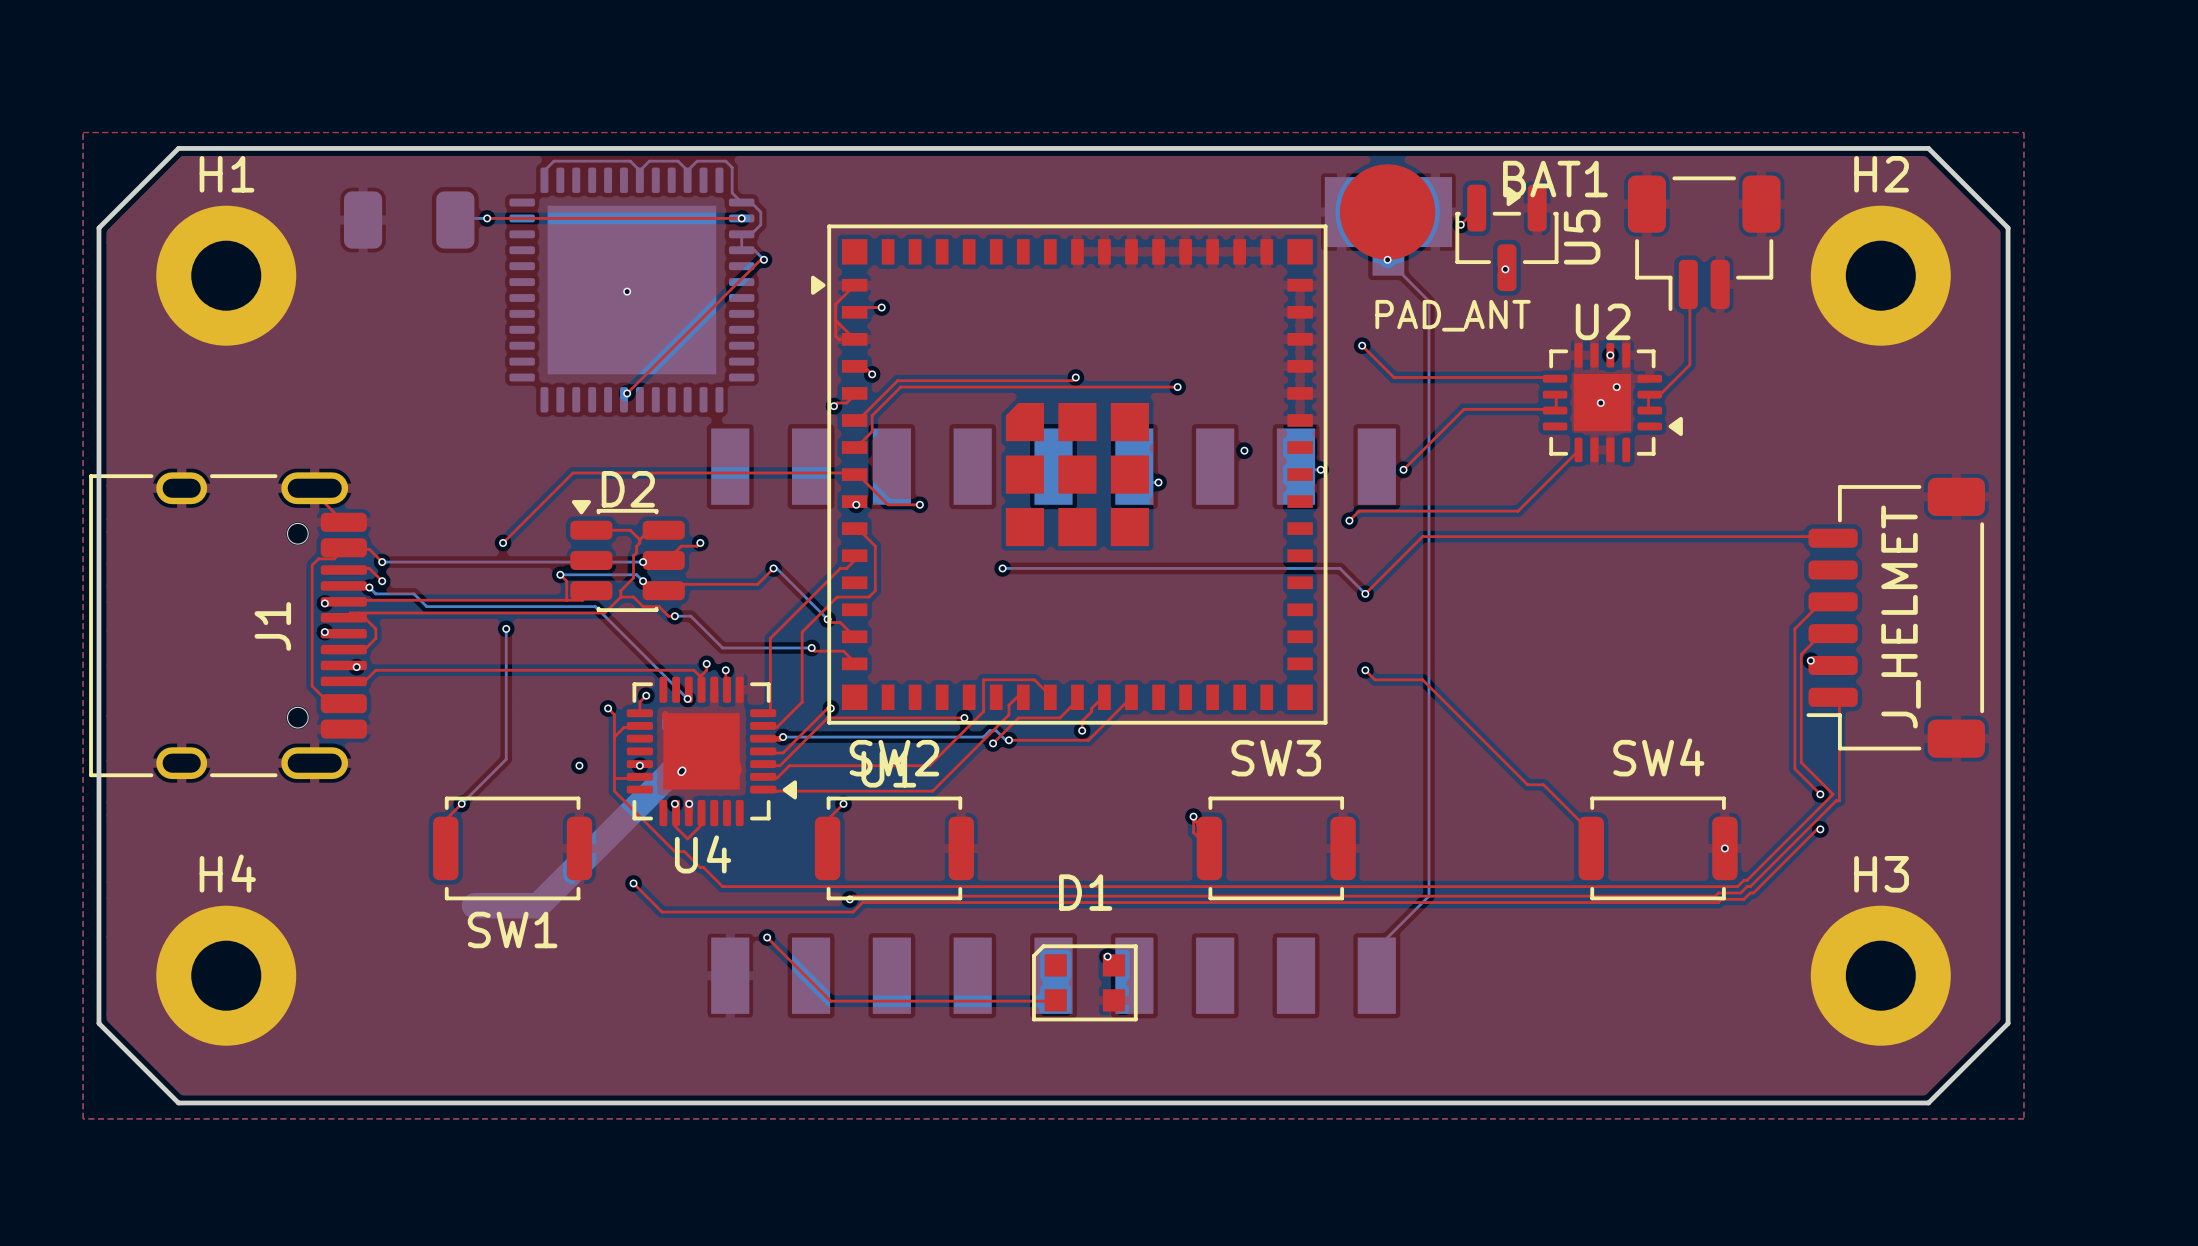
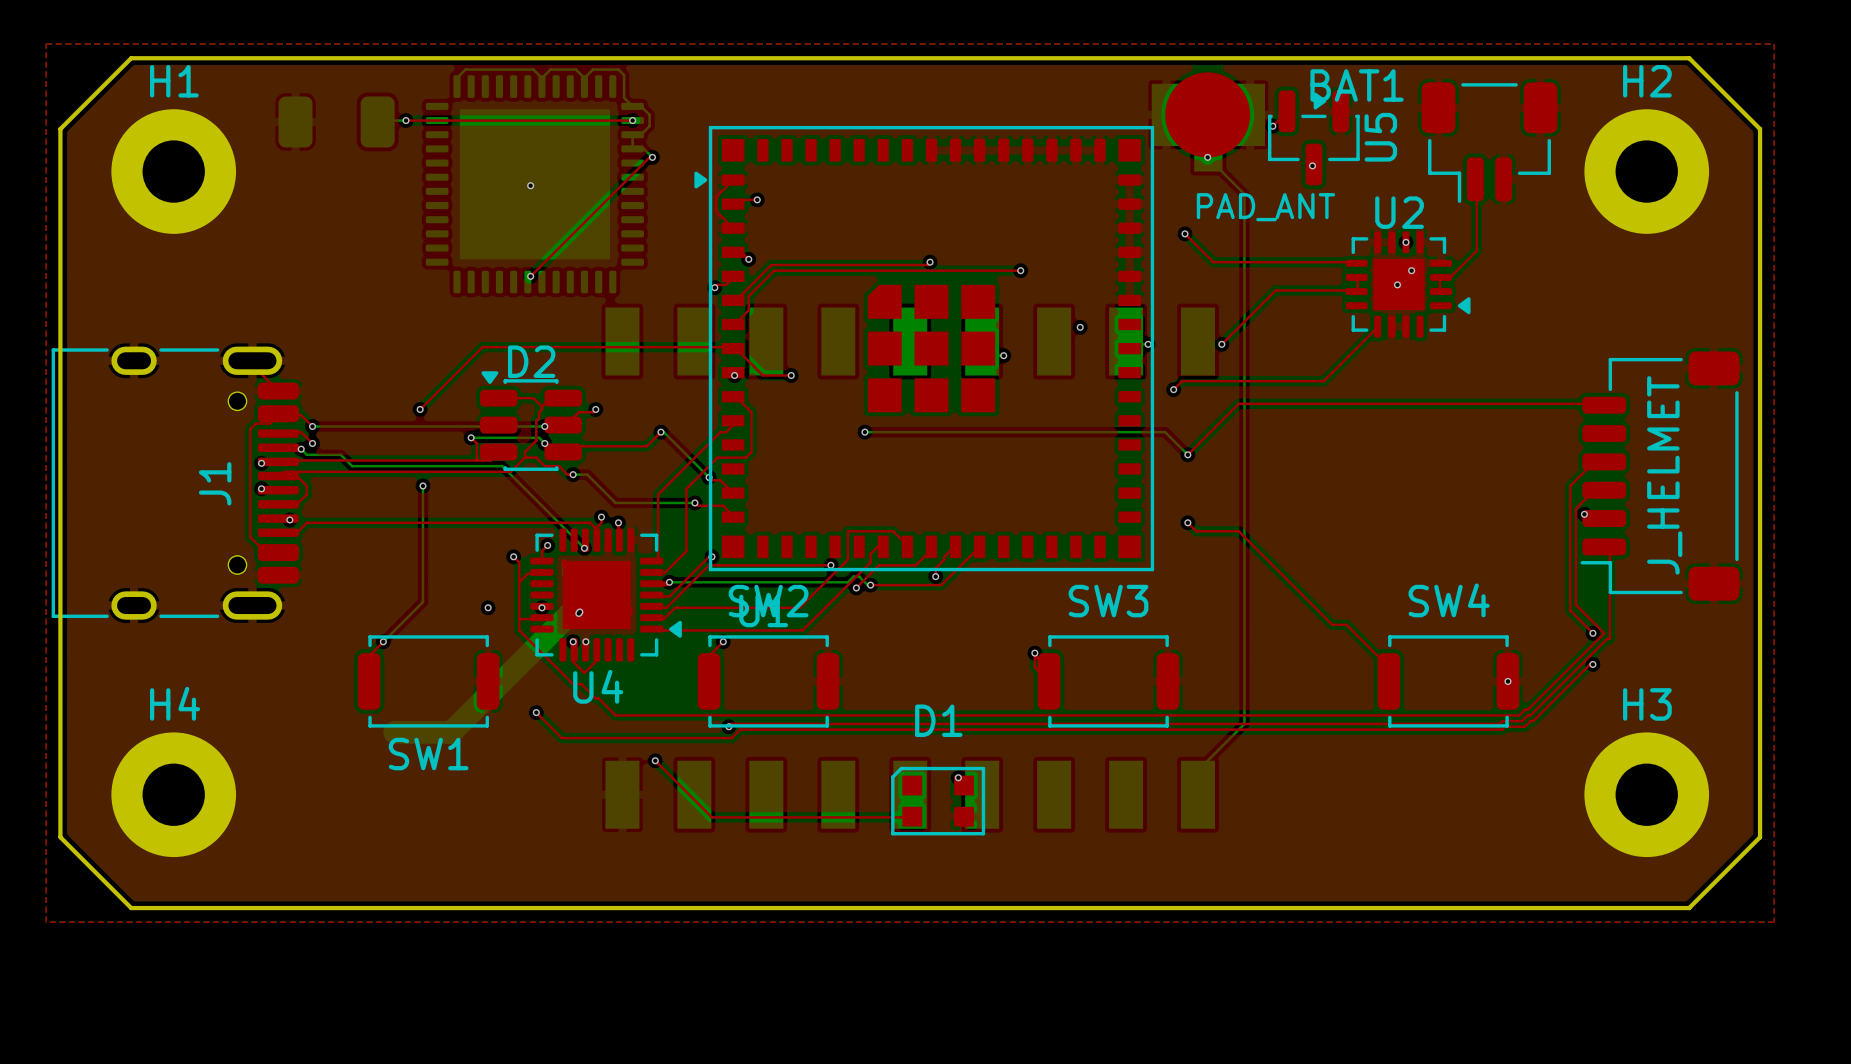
top track: (835, 320) (835, 336) (838, 339) (854, 339) -> none

